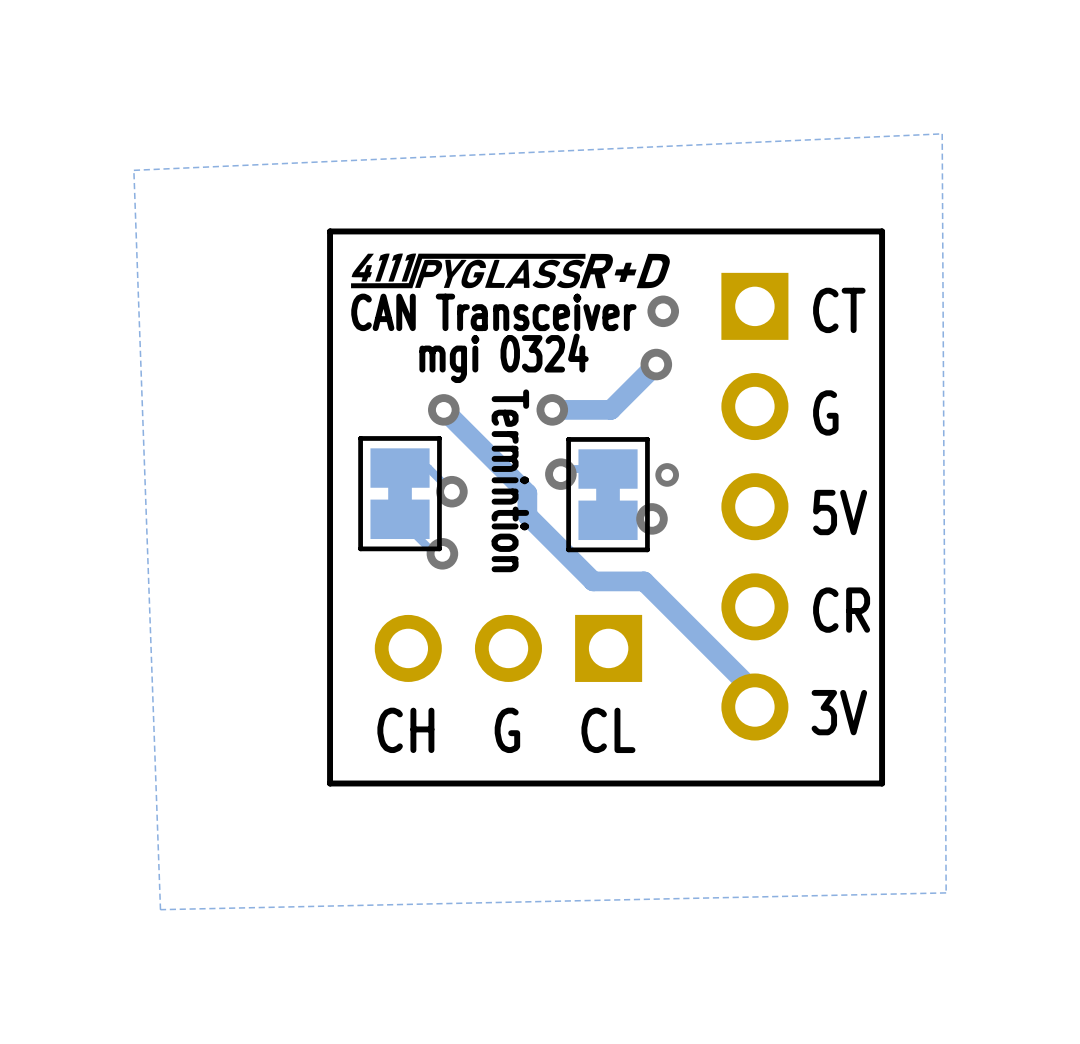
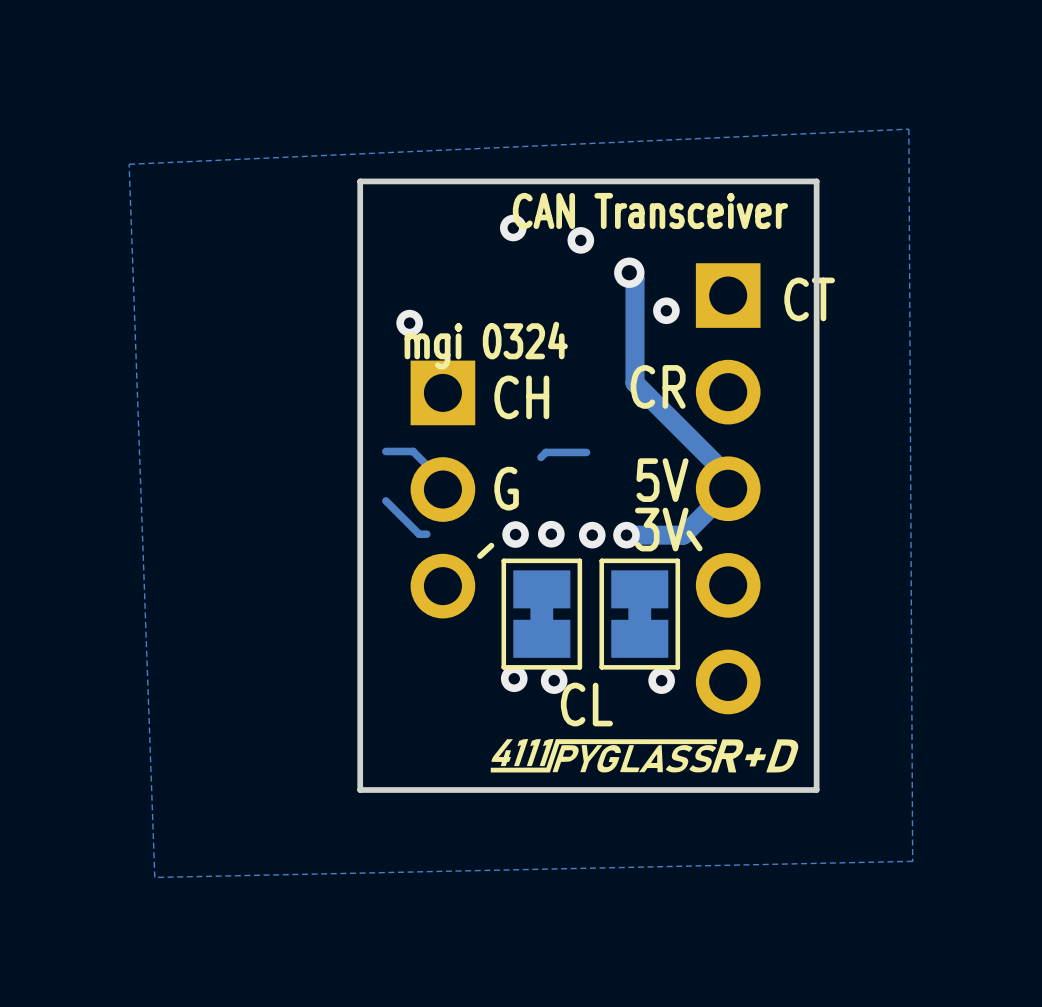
board edge: (882, 231) (330, 231) (330, 783) (882, 783) (882, 231) -> (816, 181) (816, 790) (360, 790) (360, 181) (816, 181)
via: none -> (513, 228)
via: none -> (580, 240)
drawing position: (510, 270) -> (644, 755)
track: none -> (629, 272) (635, 278) (635, 383) (728, 476) (728, 490) (683, 535) (626, 535)
via position: (663, 311) -> (629, 272)
text position: CAN Transceiver (493, 312) -> CAN Transceiver (650, 210)
via: none -> (666, 310)
via: none -> (409, 323)
track: (656, 364) (610, 409) (552, 409) -> none
via: (656, 364) -> none
track: (443, 409) (527, 493) (527, 515) (593, 581) (644, 581) (754, 692) (754, 706) -> none
via: (443, 409) -> none
via: (552, 409) -> none
text: G (825, 412) -> none
via: (560, 474) -> none
via: (667, 474) -> none
text: Termintion (510, 480) -> none
via: (451, 491) -> none
part: (400, 493) -> none
part: (608, 494) -> none
text: none -> G (506, 488)
text position: 5V (840, 512) -> 5V (662, 480)
via: (651, 518) -> none
line: none -> (689, 533) (699, 548)
via: (442, 553) -> none
via: none -> (551, 534)
via: none -> (515, 534)
via: none -> (592, 535)
via: none -> (626, 535)
line: none -> (491, 545) (480, 556)
text position: CR (841, 610) -> CR (658, 386)
part: none -> (541, 614)
part: none -> (639, 614)
part rotation: 0° (508, 648) -> 90° counterclockwise (442, 489)
via: none -> (514, 678)
via: none -> (554, 680)
via: none -> (661, 680)
text position: 3V (839, 712) -> 3V (661, 529)
text position: CH (405, 730) -> CH (521, 397)
text: G (507, 730) -> none

